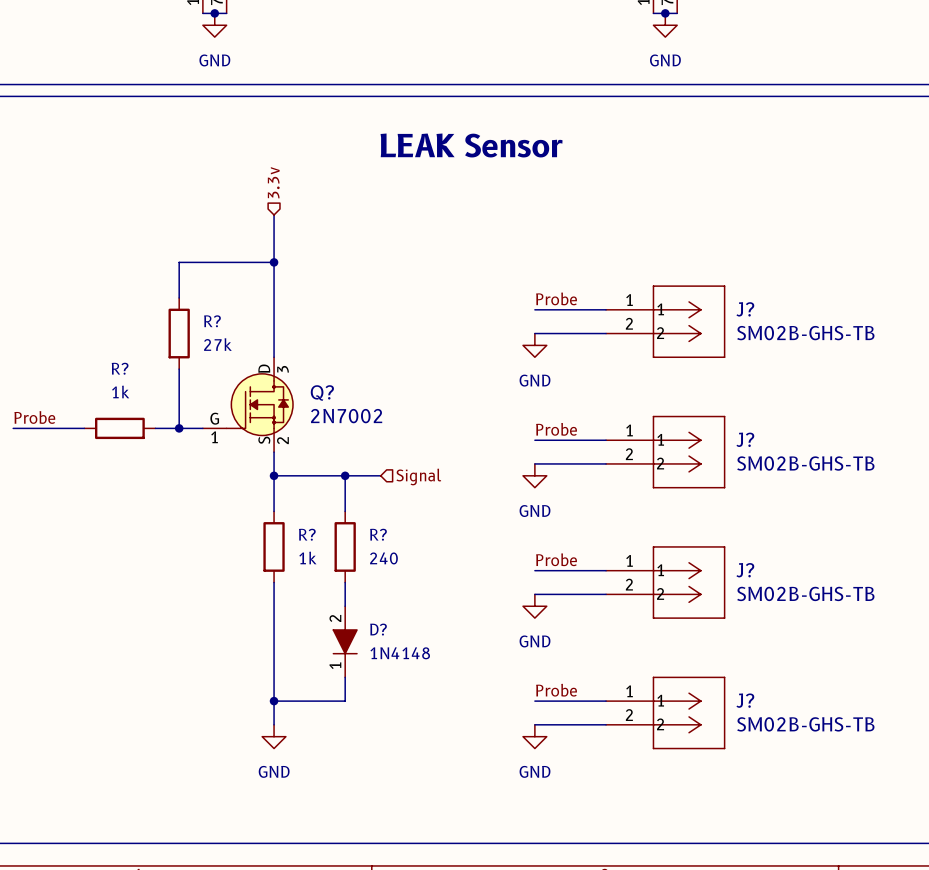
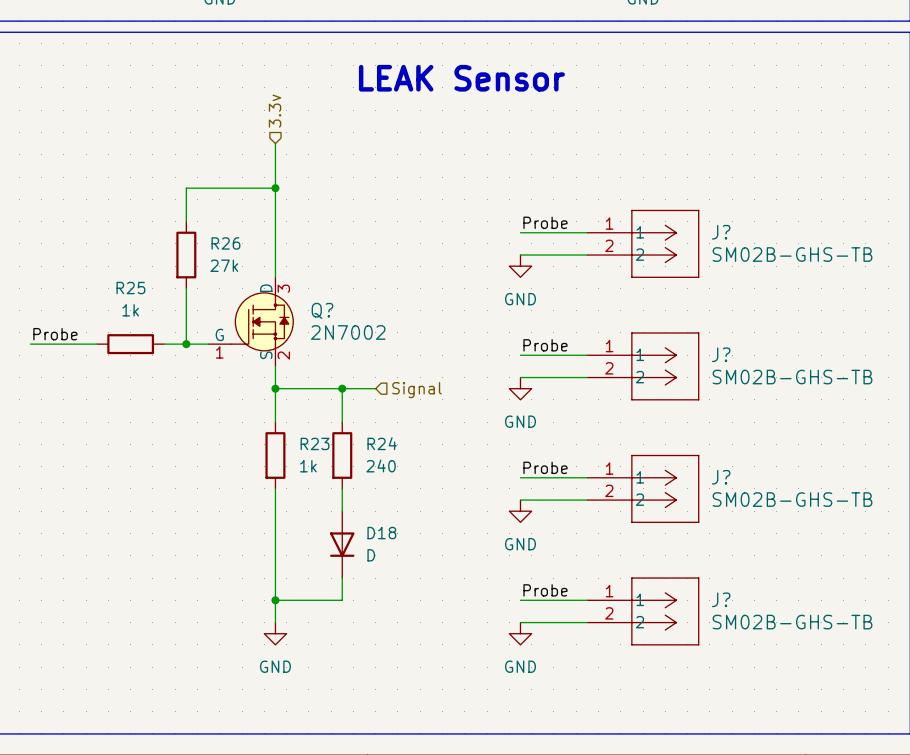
R? name: R? (212, 321) -> R26 (225, 243)
R? name: R? (120, 368) -> R25 (130, 288)
R? name: R? (307, 534) -> R23 (315, 443)
R? name: R? (378, 534) -> R24 (382, 443)
D?: 1N4148 (345, 641) -> none
D18: none -> D (342, 544)

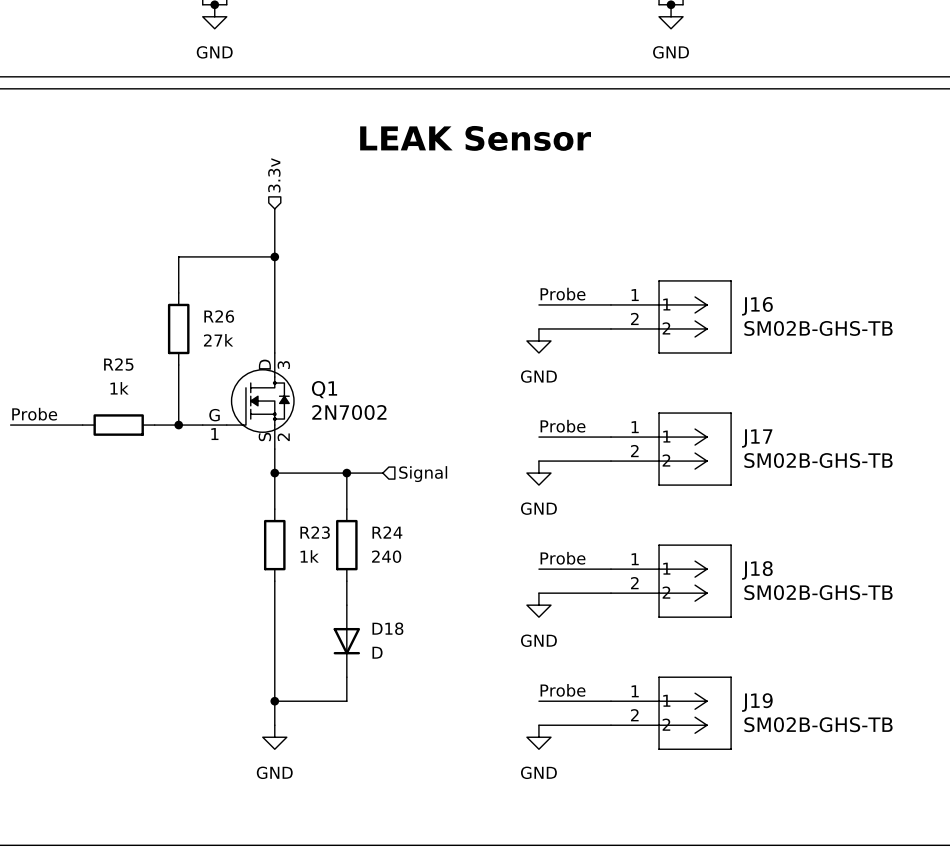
J? name: J? (721, 232) -> J16 (757, 306)
Q? name: Q? (322, 310) -> Q1 (324, 389)
J? name: J? (721, 354) -> J17 (757, 438)
J? name: J? (721, 477) -> J18 (757, 570)
J? name: J? (721, 599) -> J19 (757, 702)

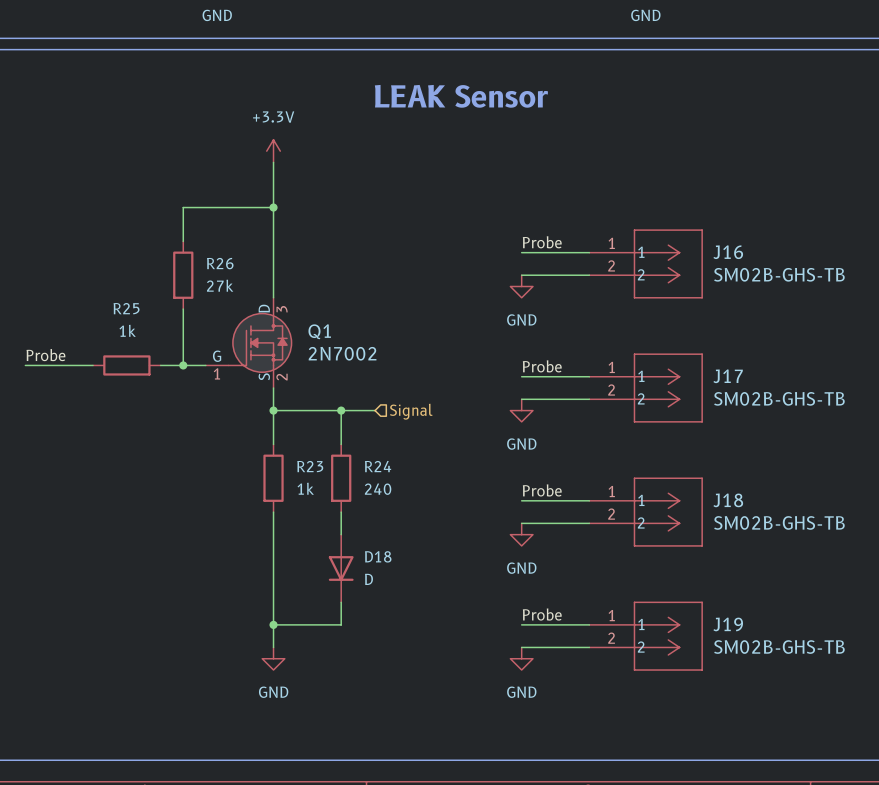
hierarchical label: 3.3v (274, 175) -> none
power symbol: none -> +3.3V (273, 151)

